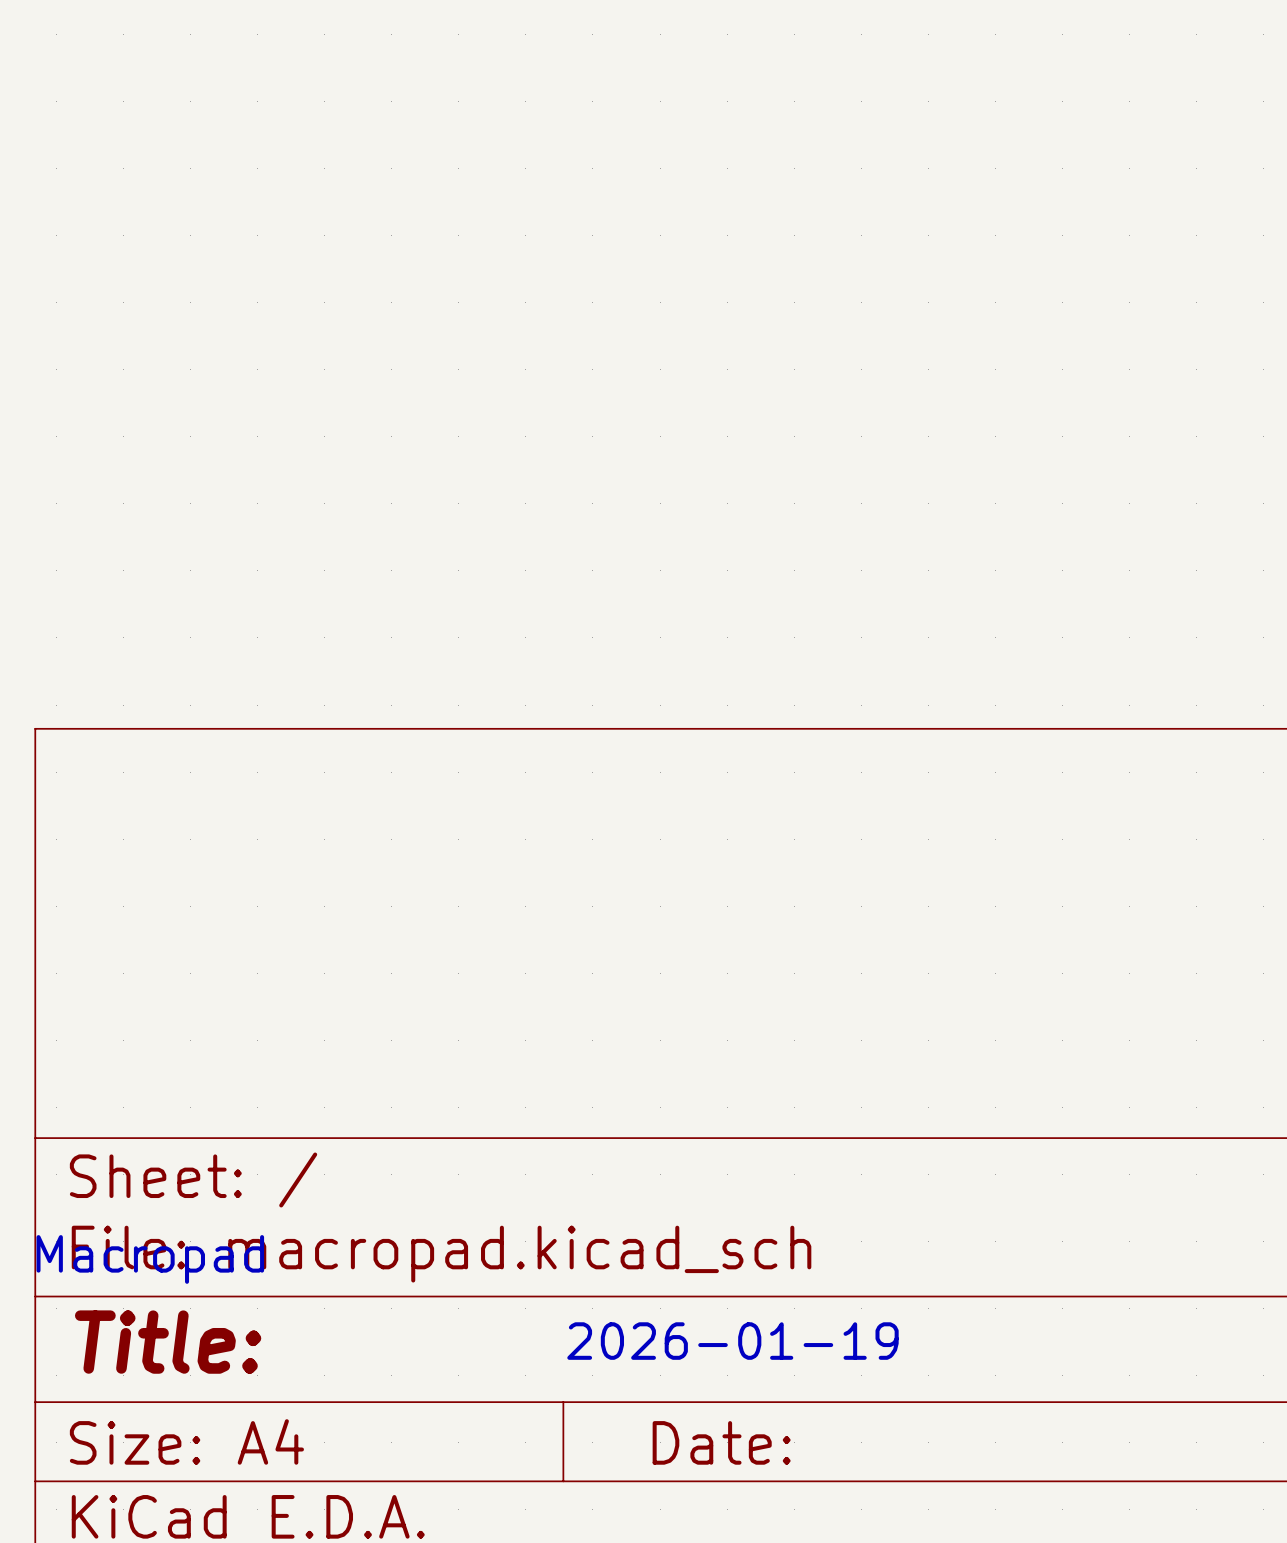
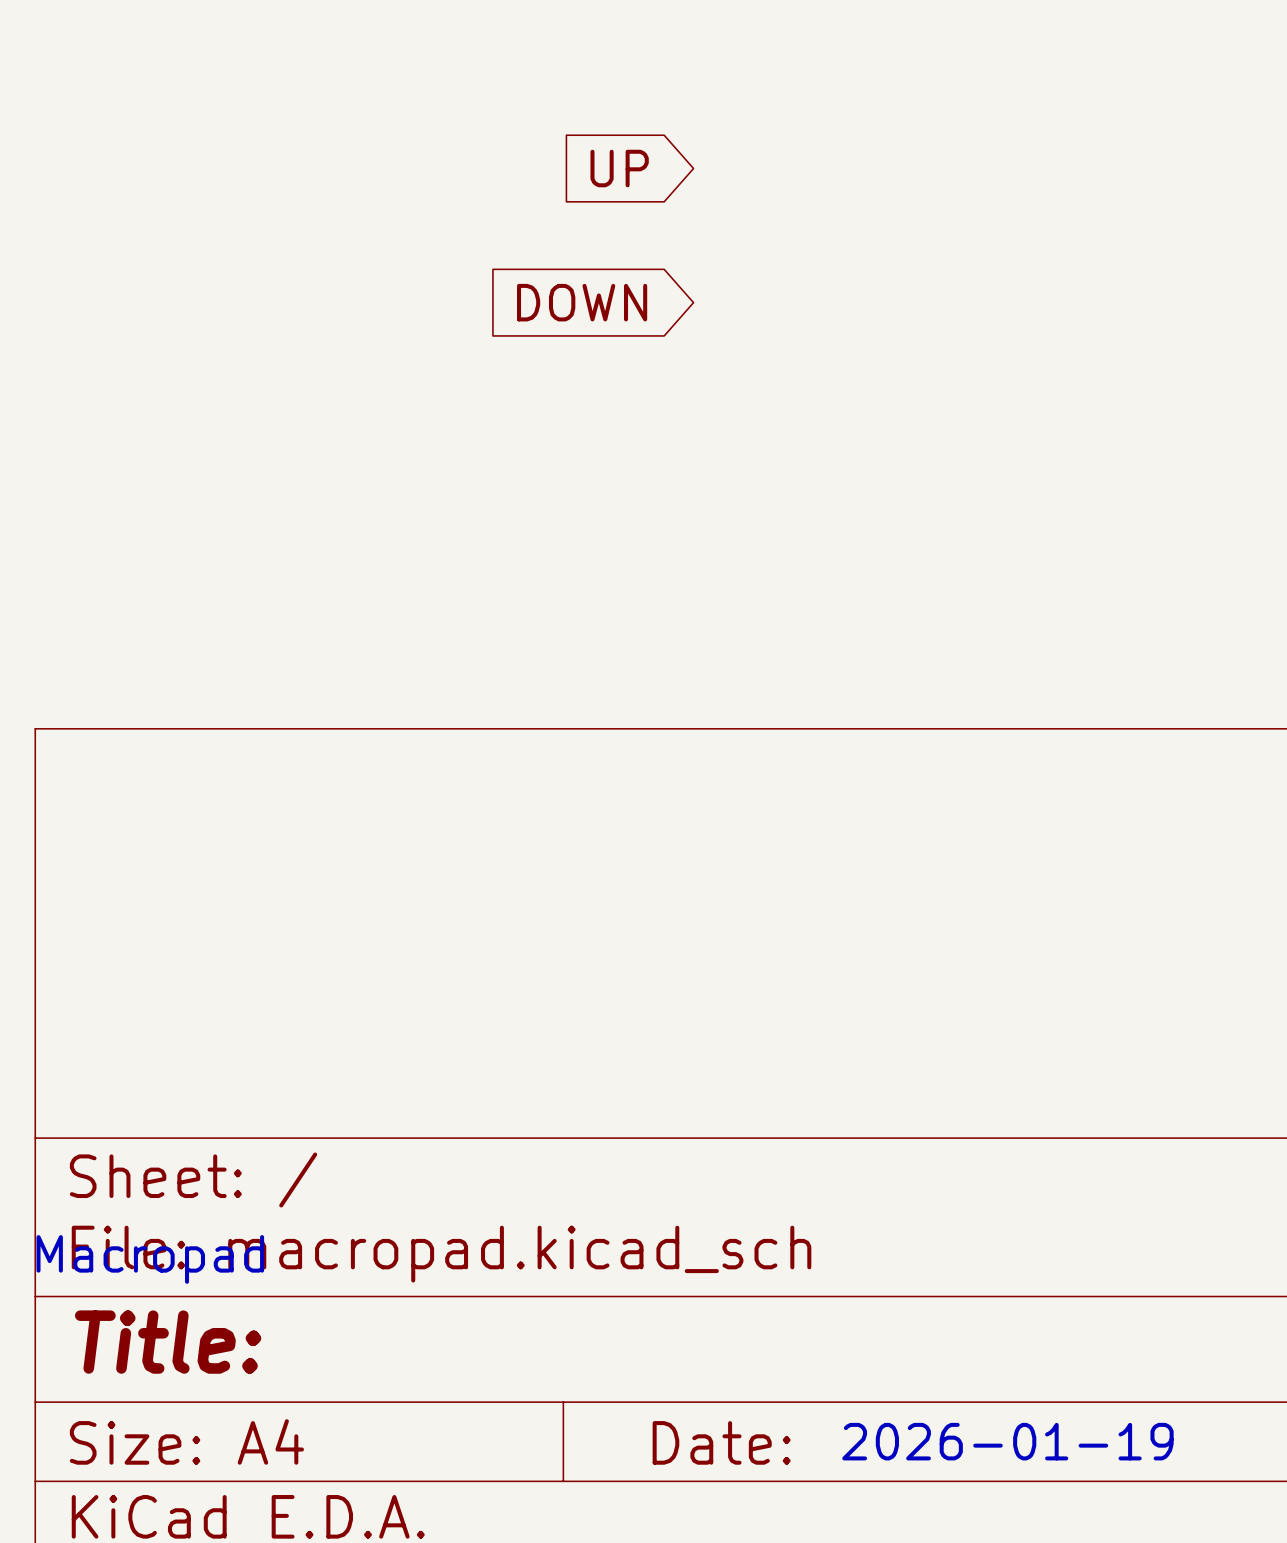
global label: none -> UP (619, 168)
global label: none -> DOWN (582, 302)
text position: 2026-01-19 (732, 1341) -> 2026-01-19 (1007, 1441)

